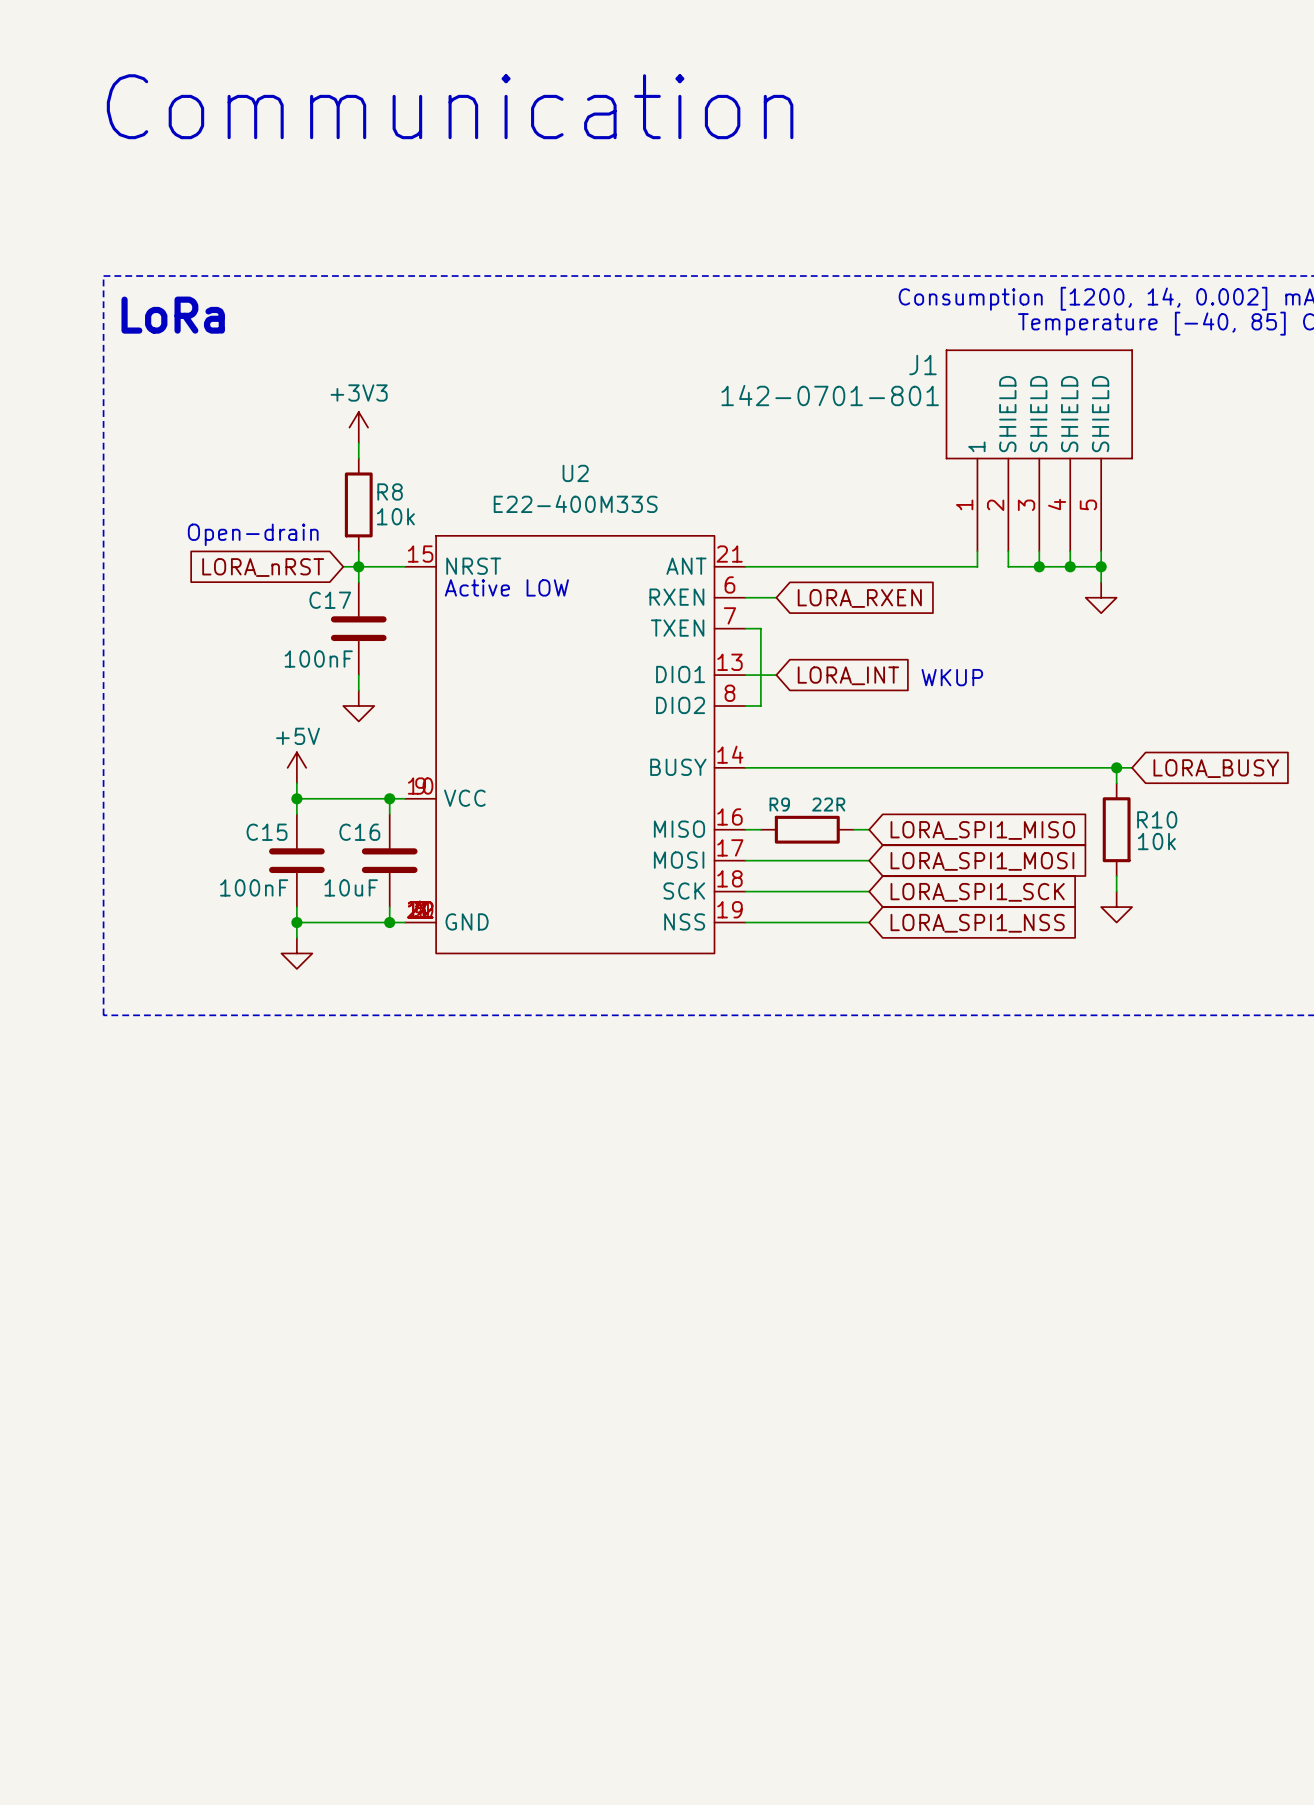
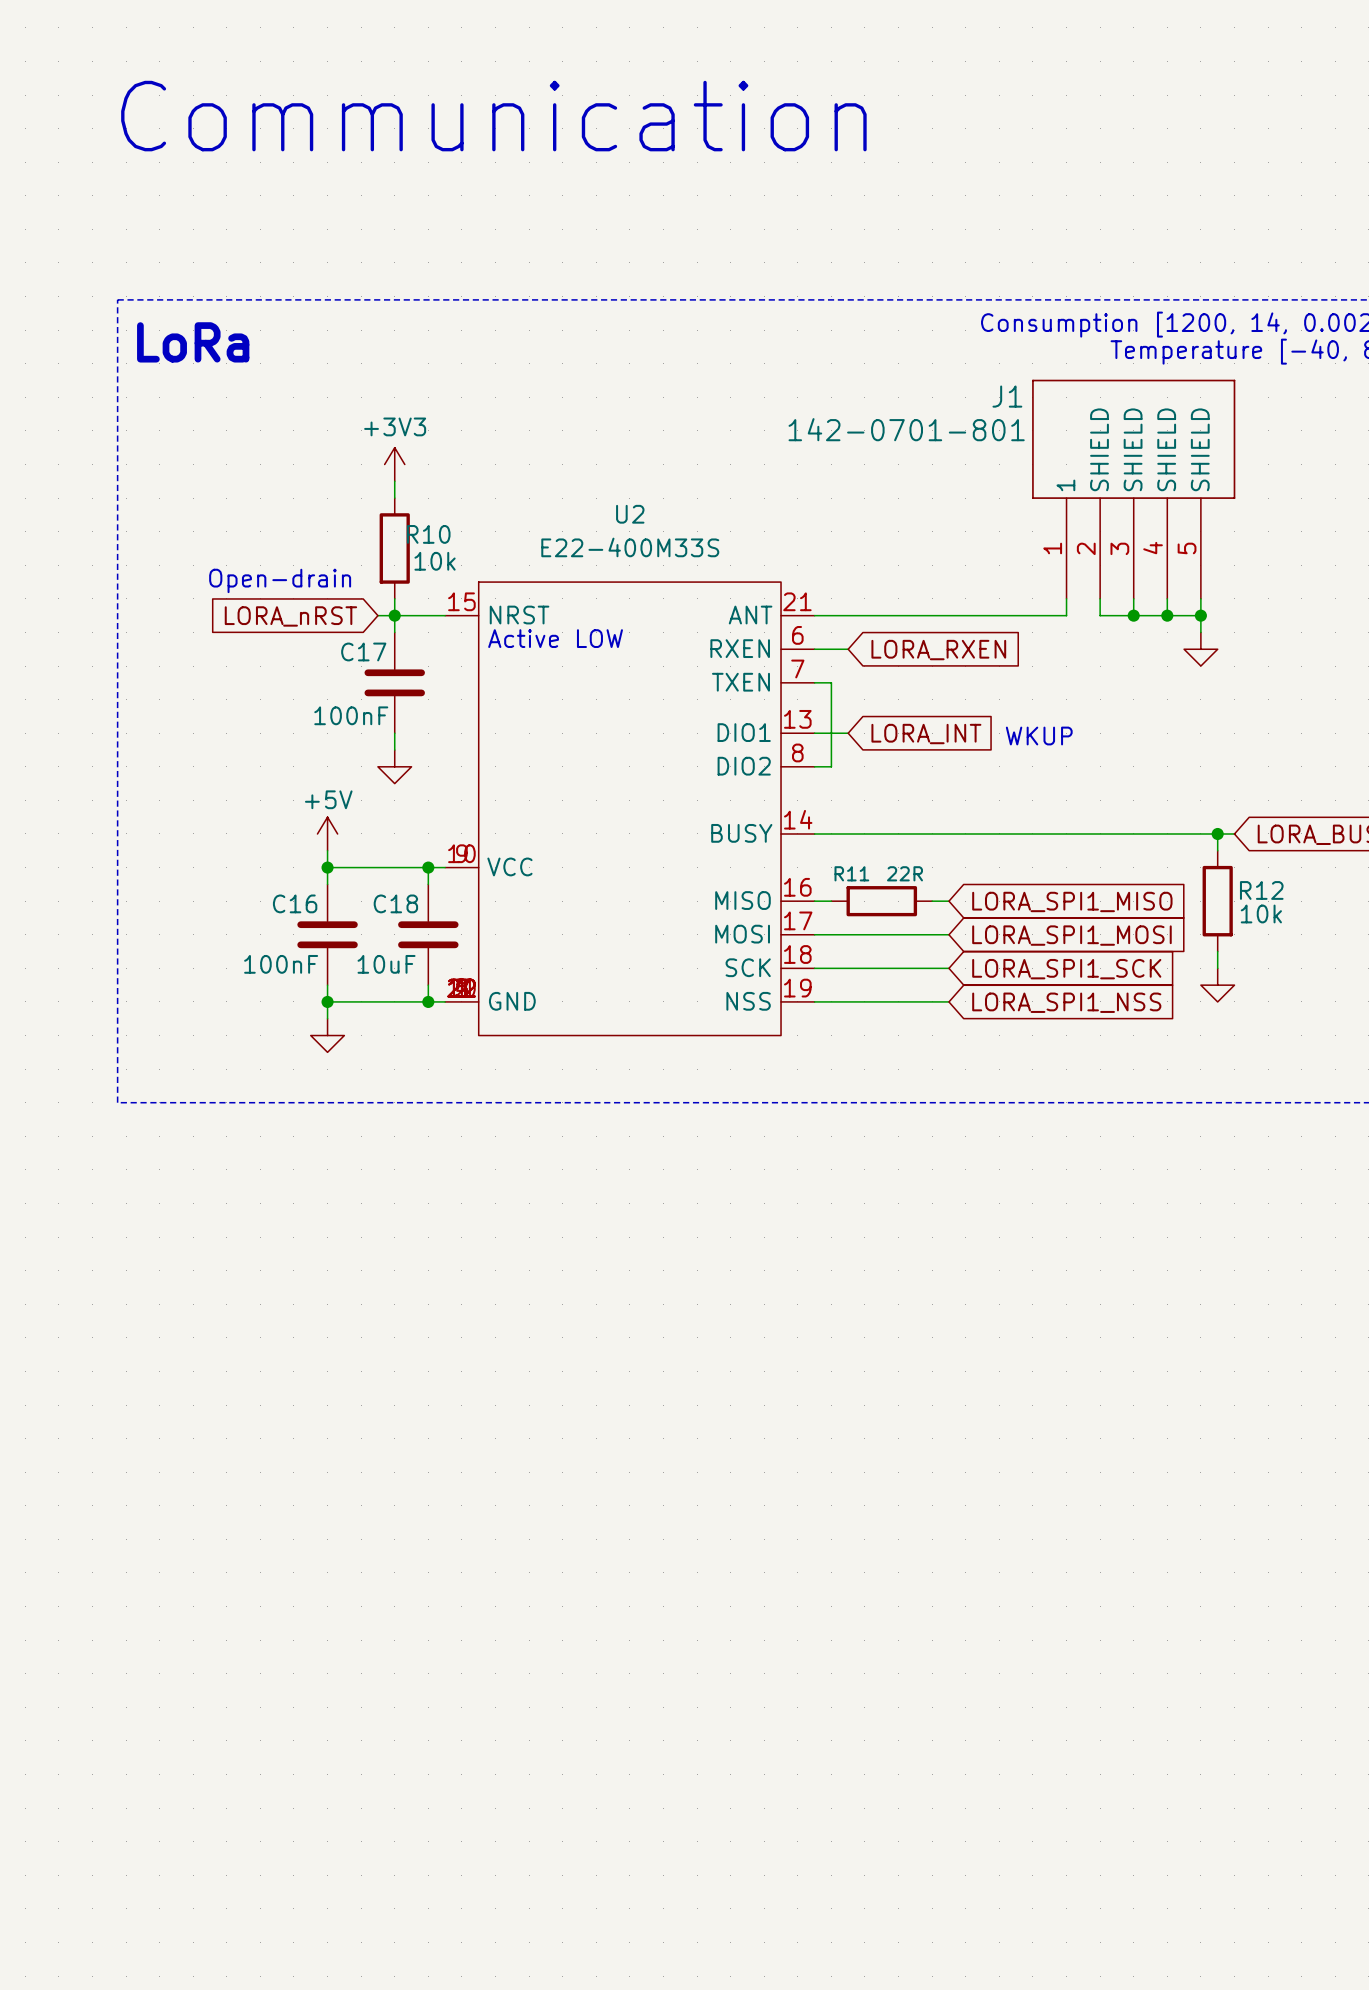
R8 name: R8 (390, 491) -> R10 (428, 534)
R9 name: R9 (779, 804) -> R11 (851, 873)
R10 name: R10 (1157, 819) -> R12 (1261, 890)
C15 name: C15 (267, 832) -> C16 (295, 903)
C16 name: C16 (359, 832) -> C18 (395, 903)

